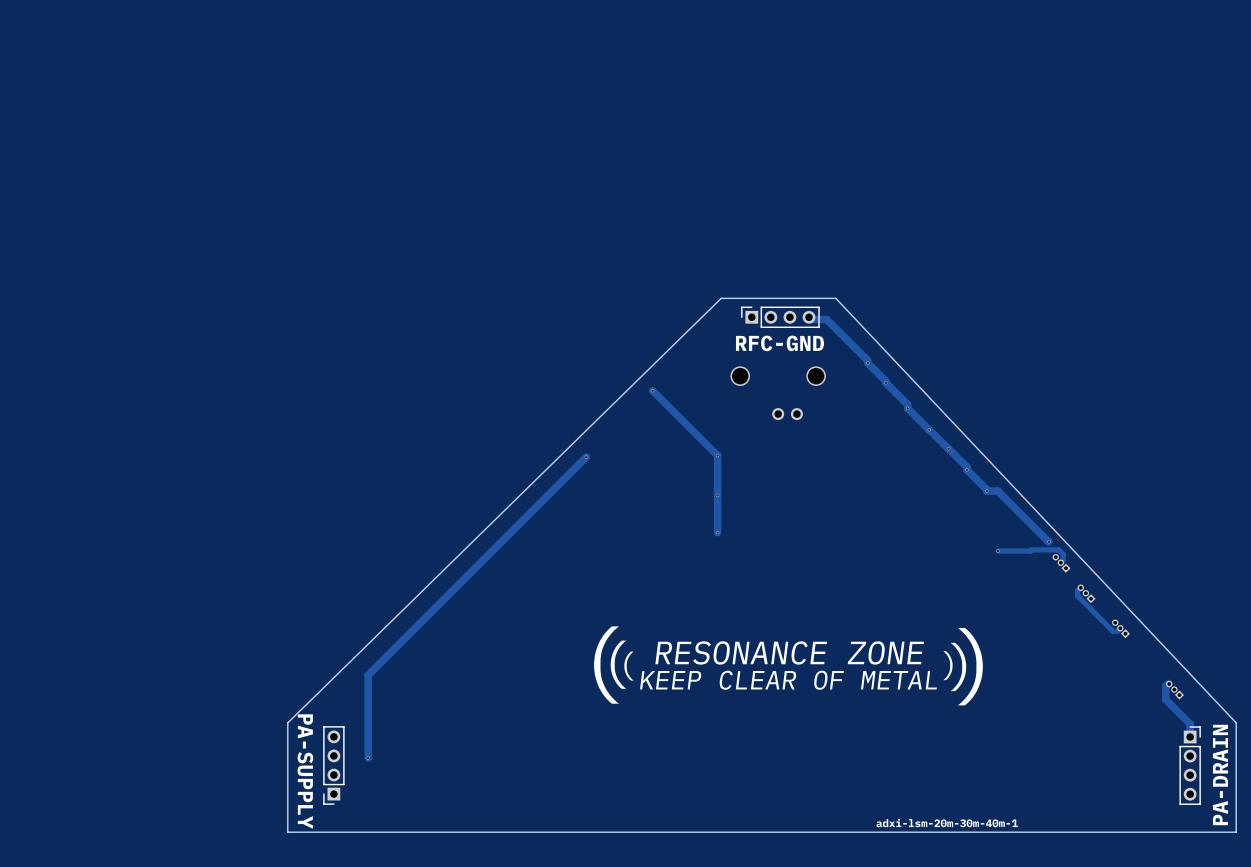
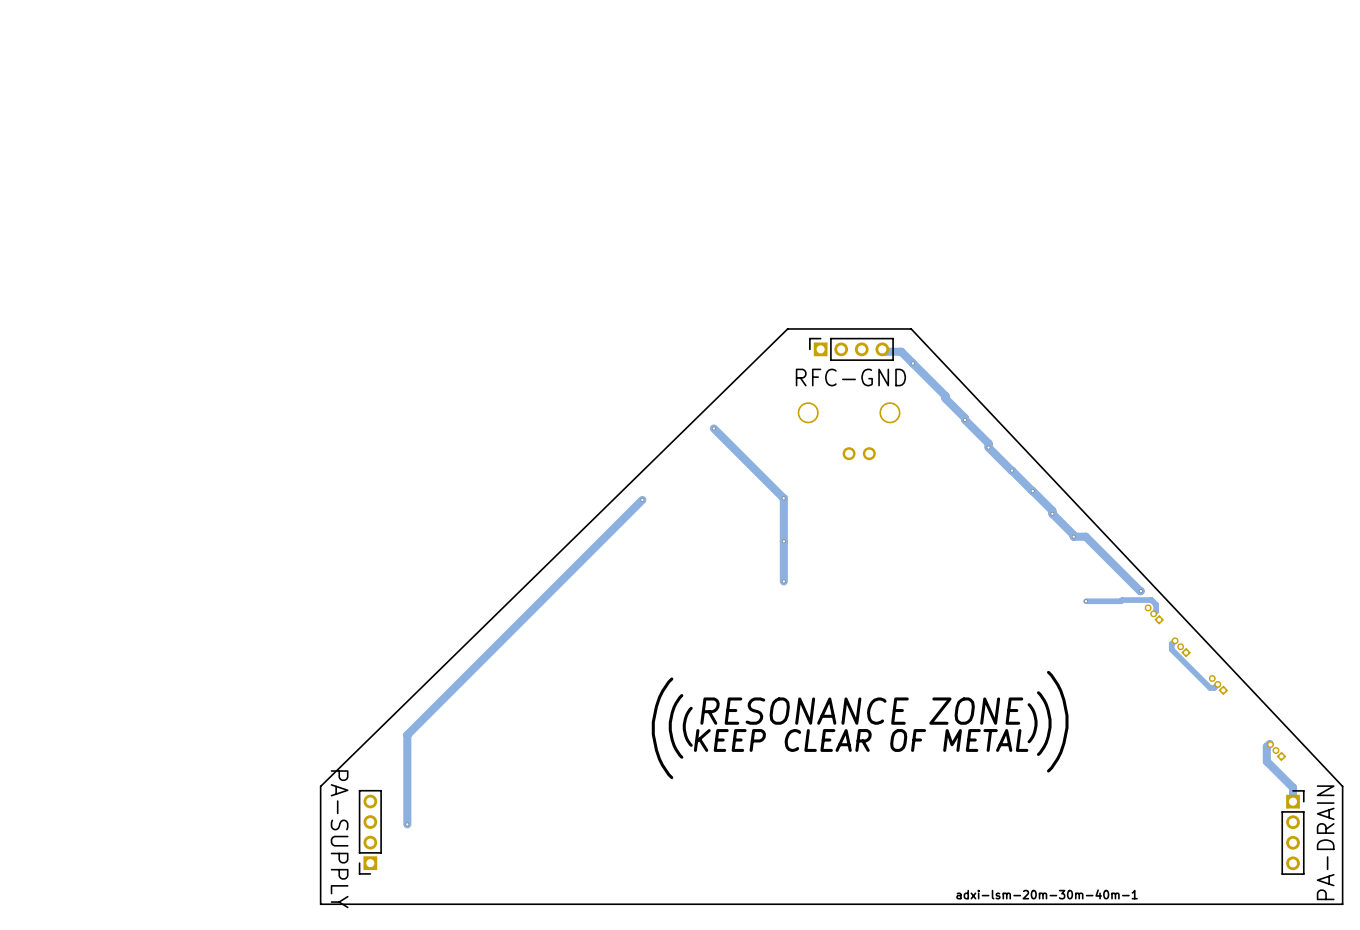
via position: (867, 362) -> (912, 363)

